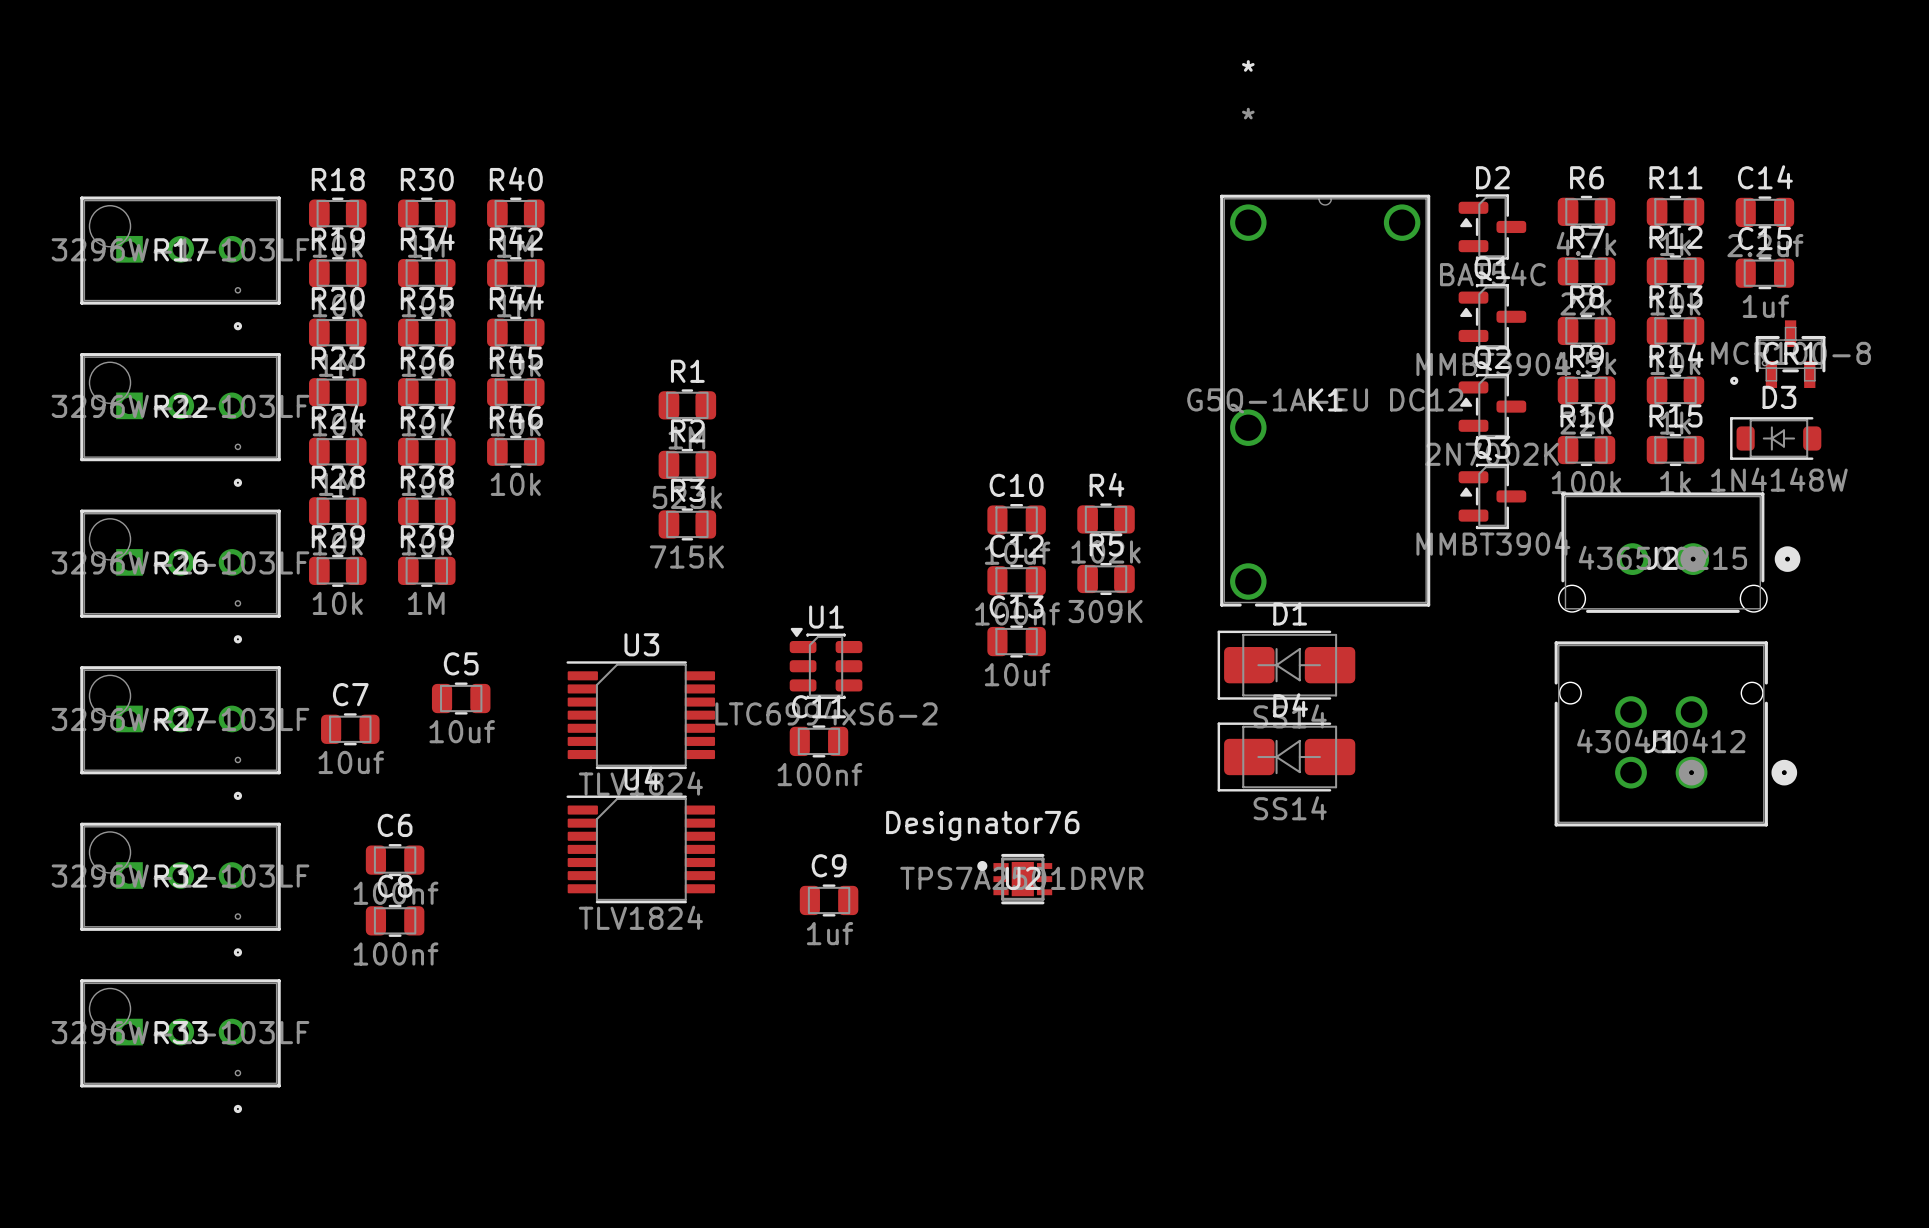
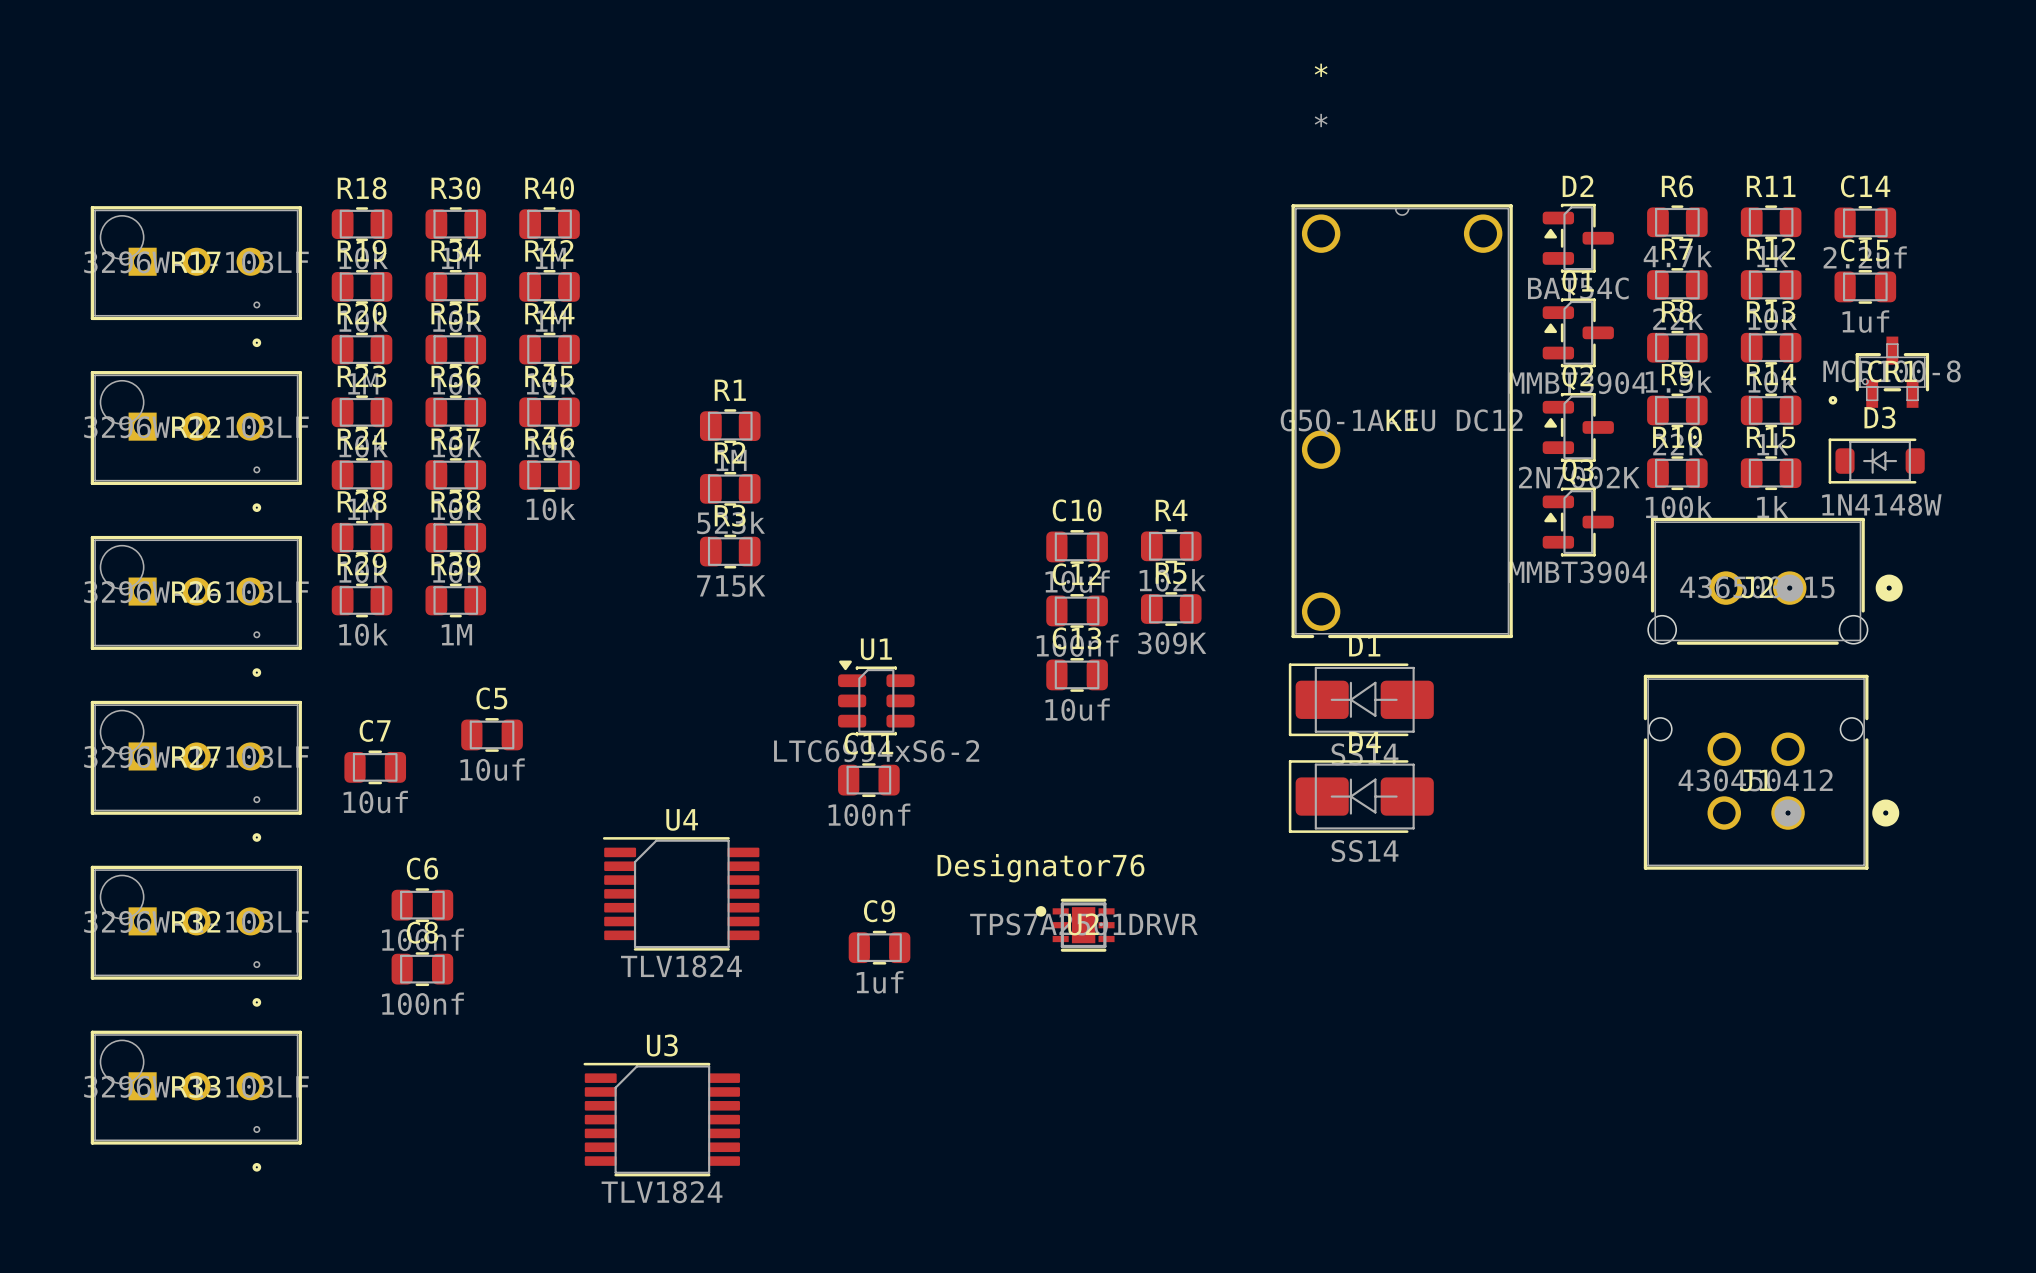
U3 position: (640, 715) -> (661, 1119)

